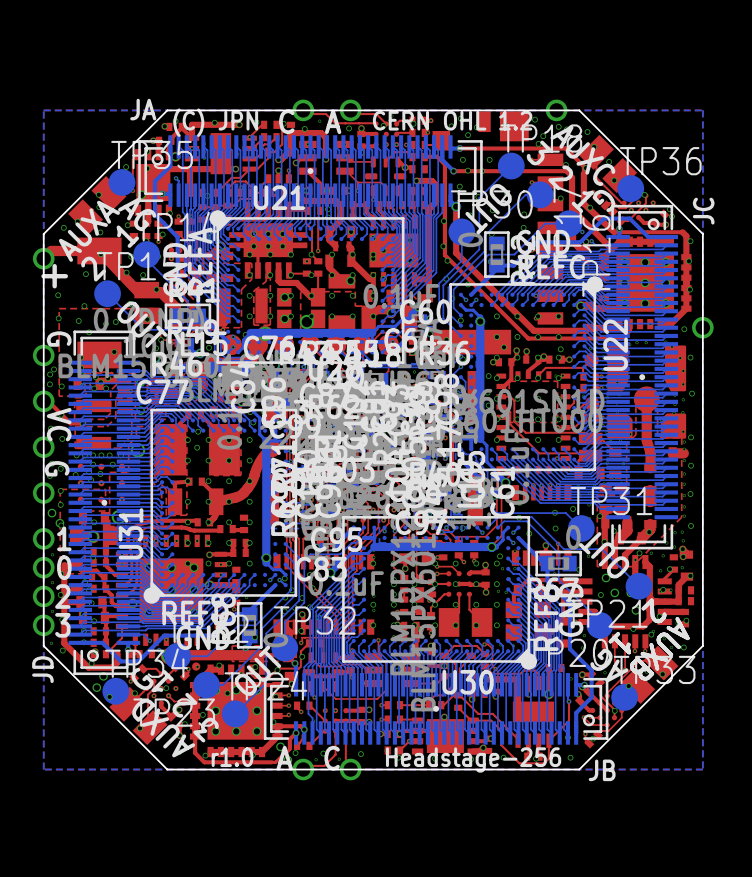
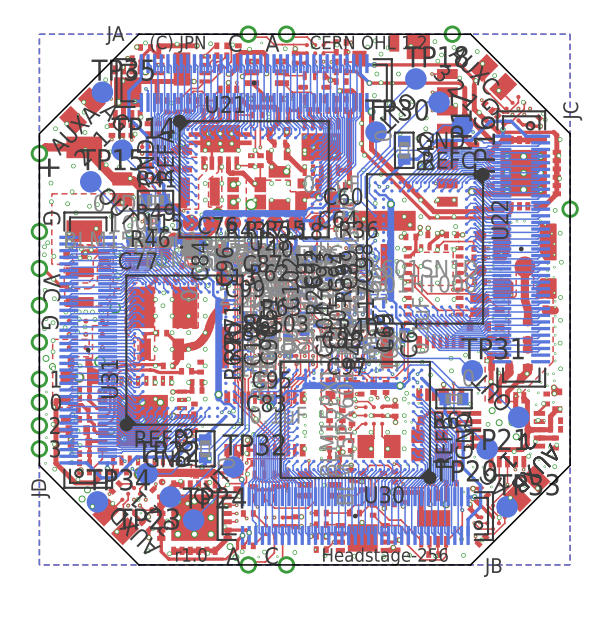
TP36: (630, 188) -> none
text: G (142, 678) -> none

